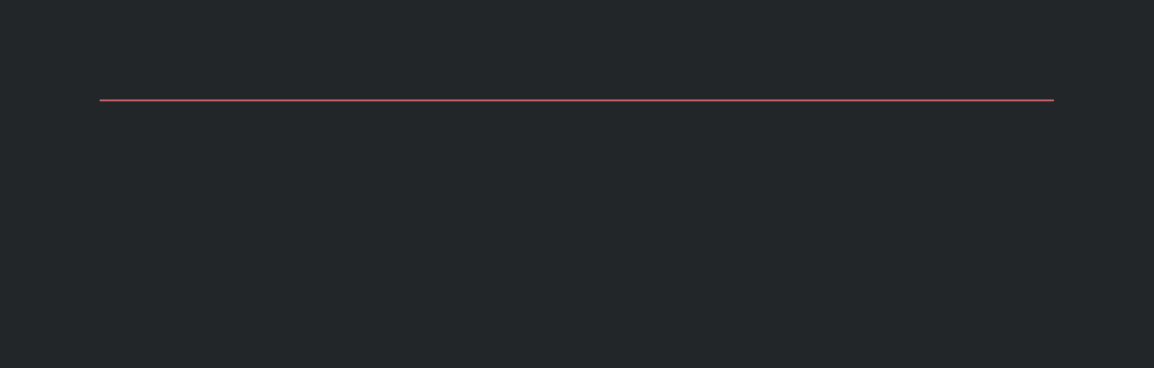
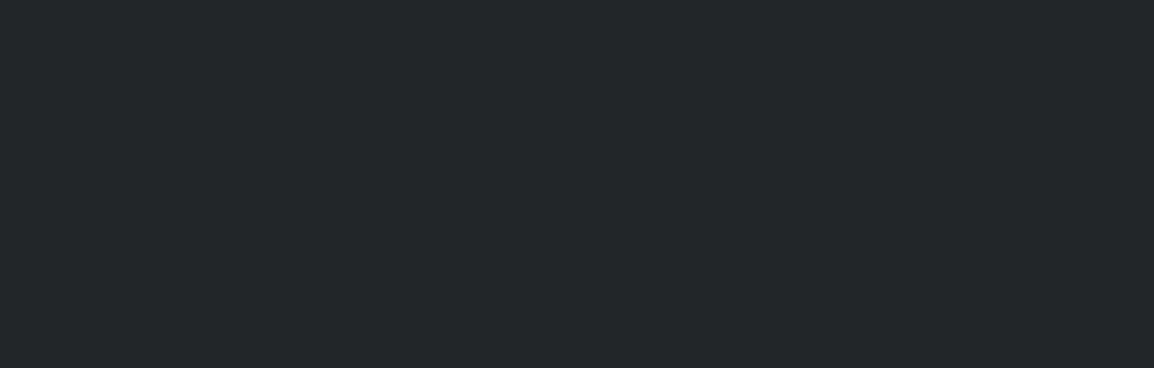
part: (576, 100) -> none

